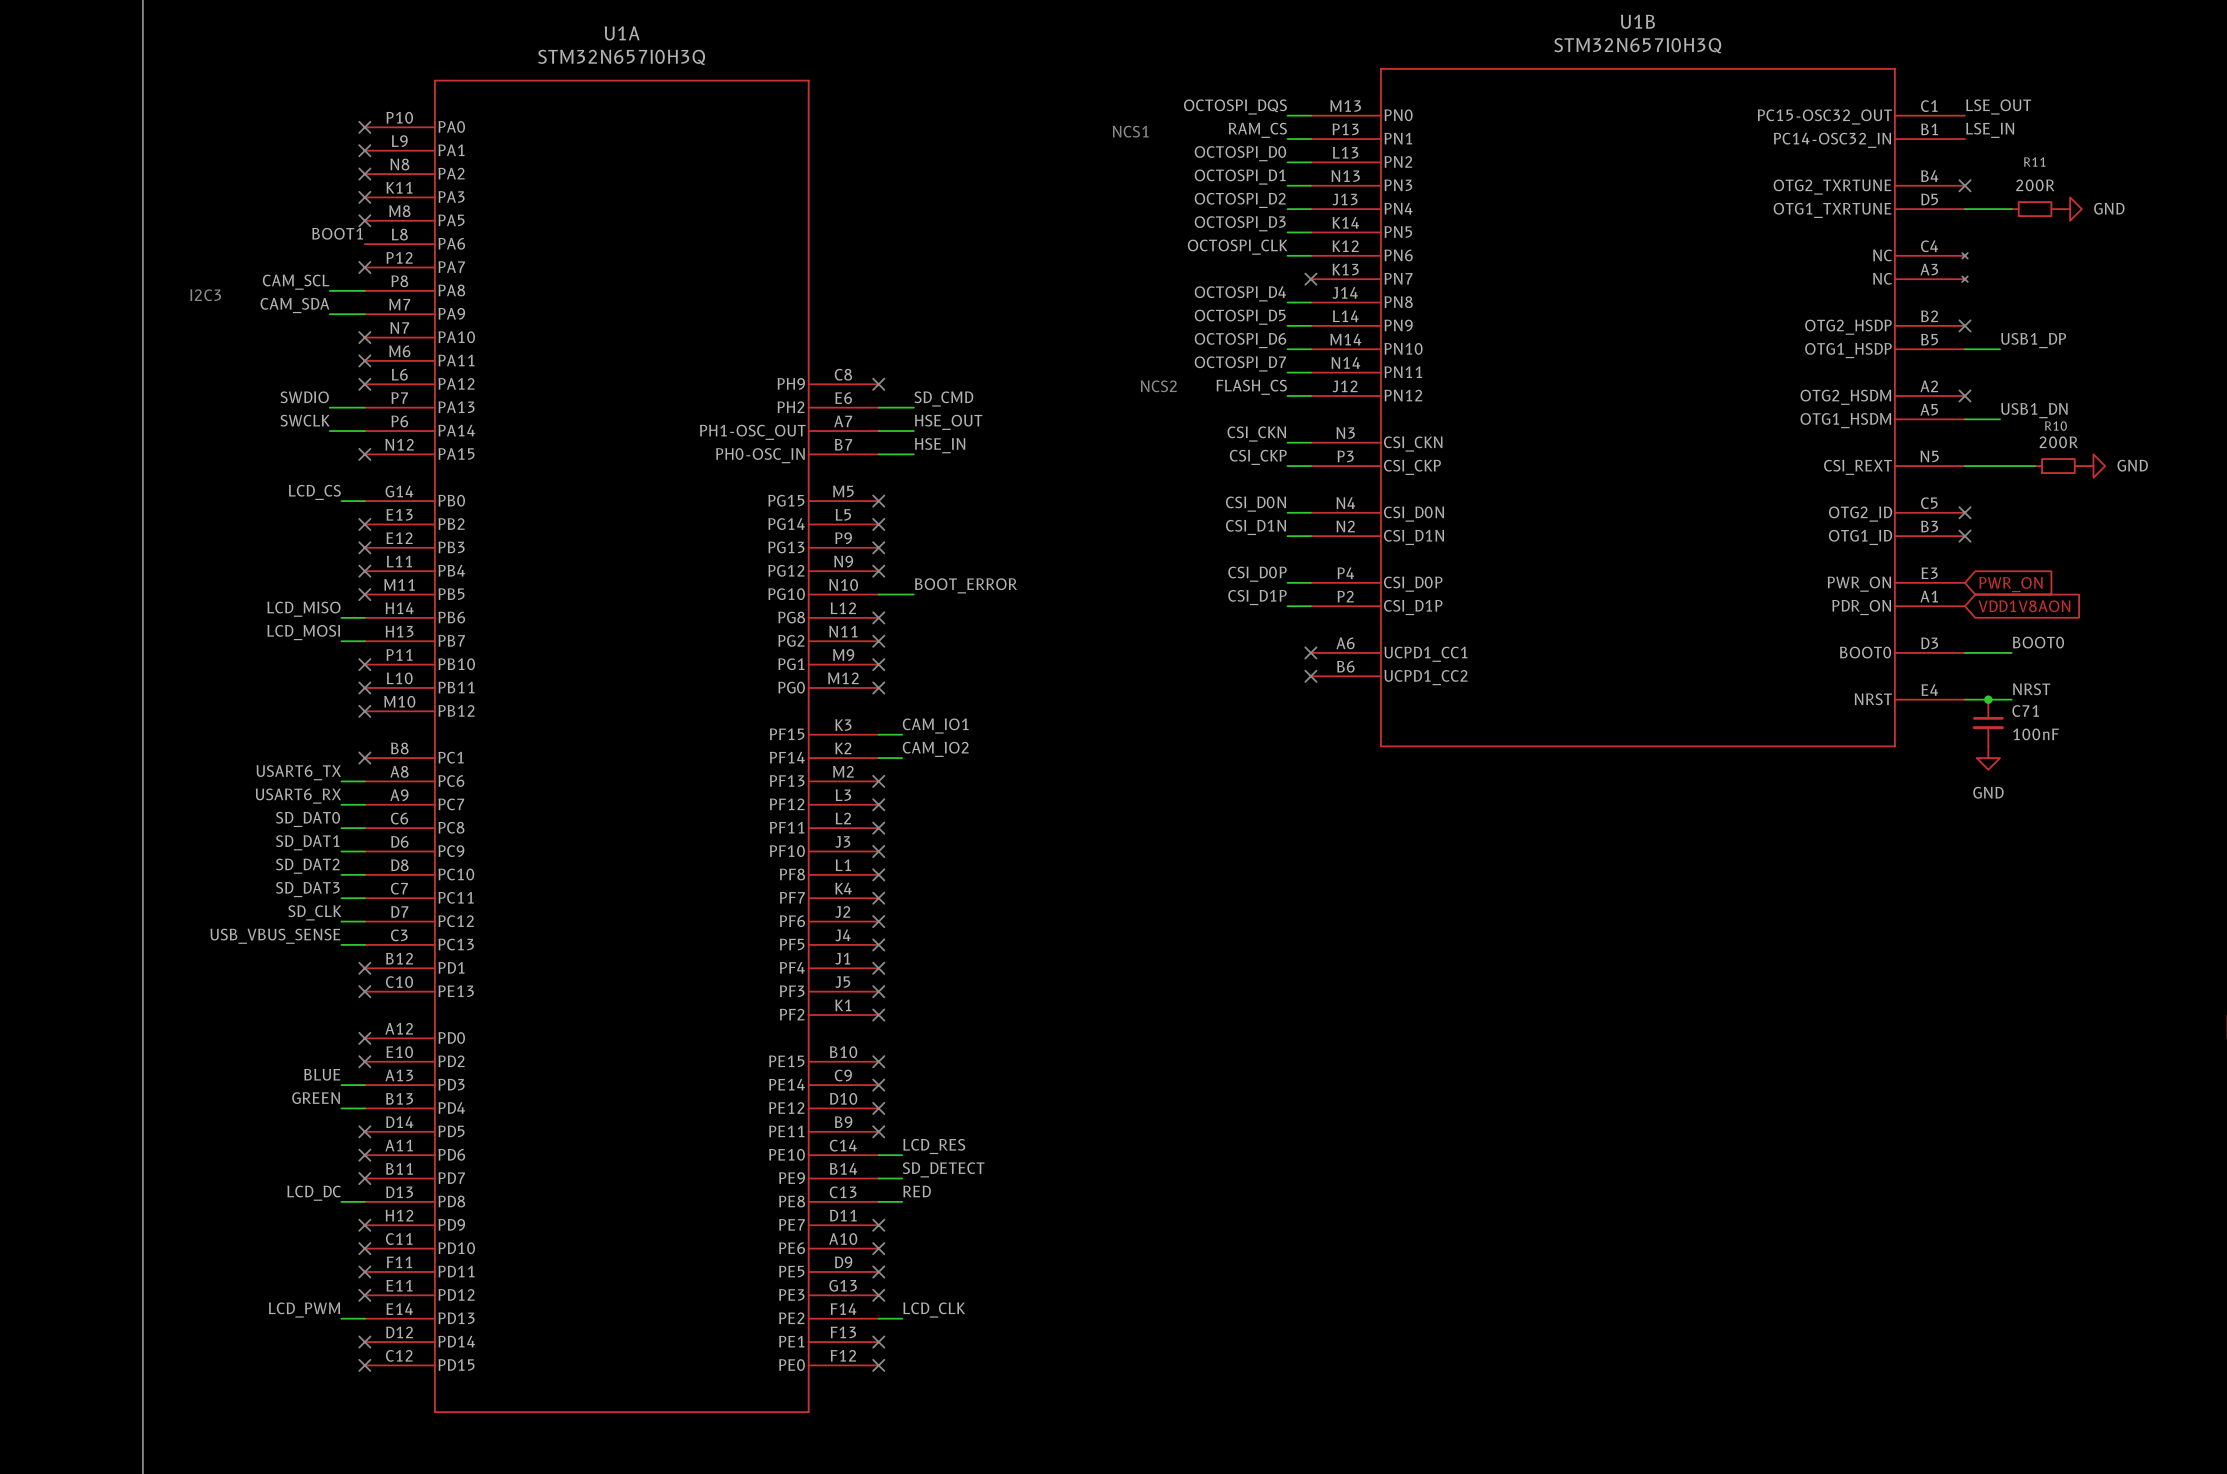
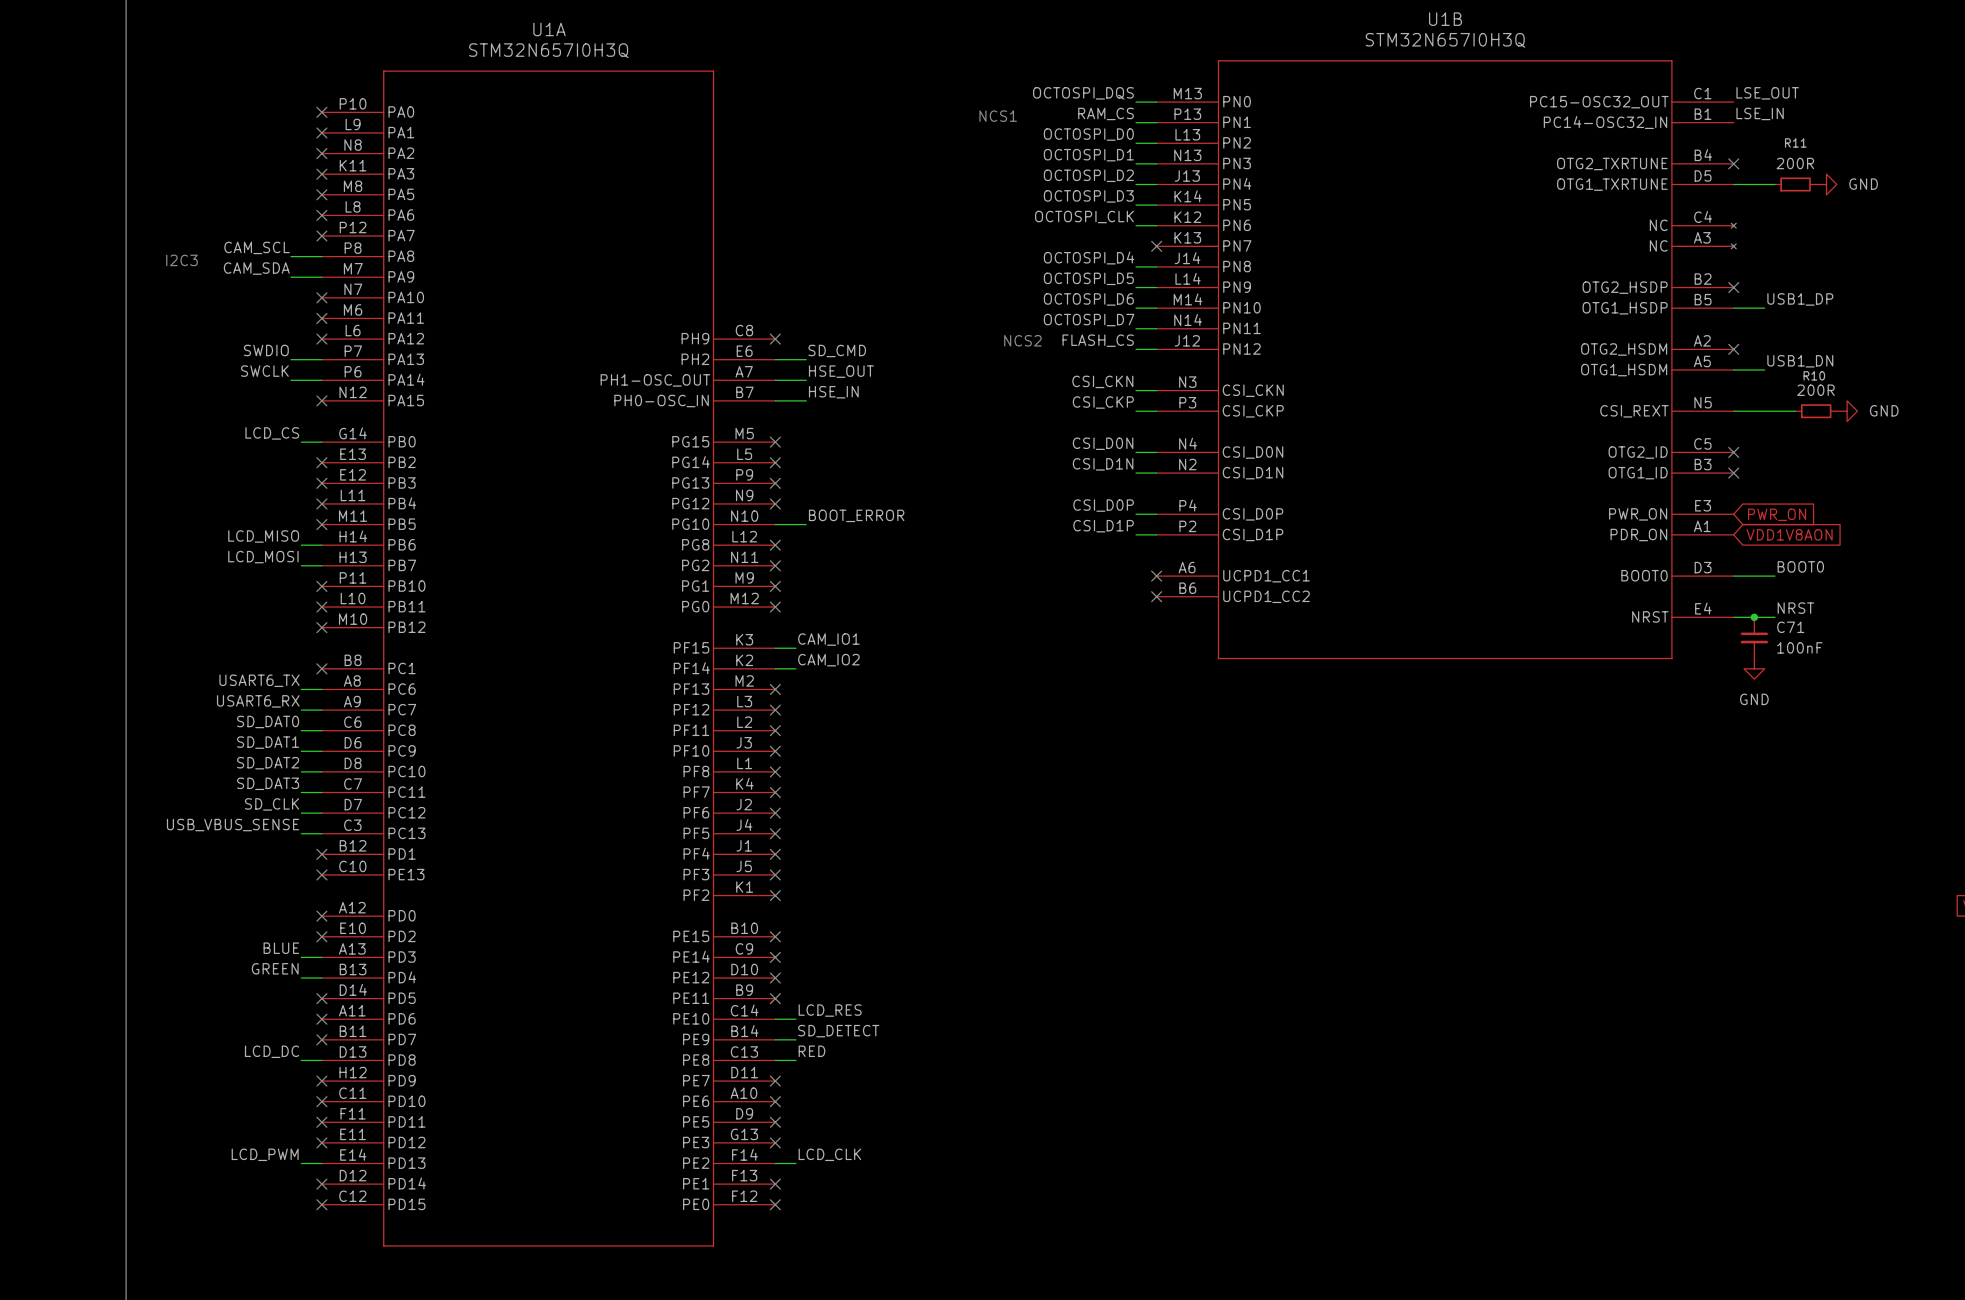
label: BOOT1 (337, 233) -> none
no-connect mark: none -> (321, 215)

